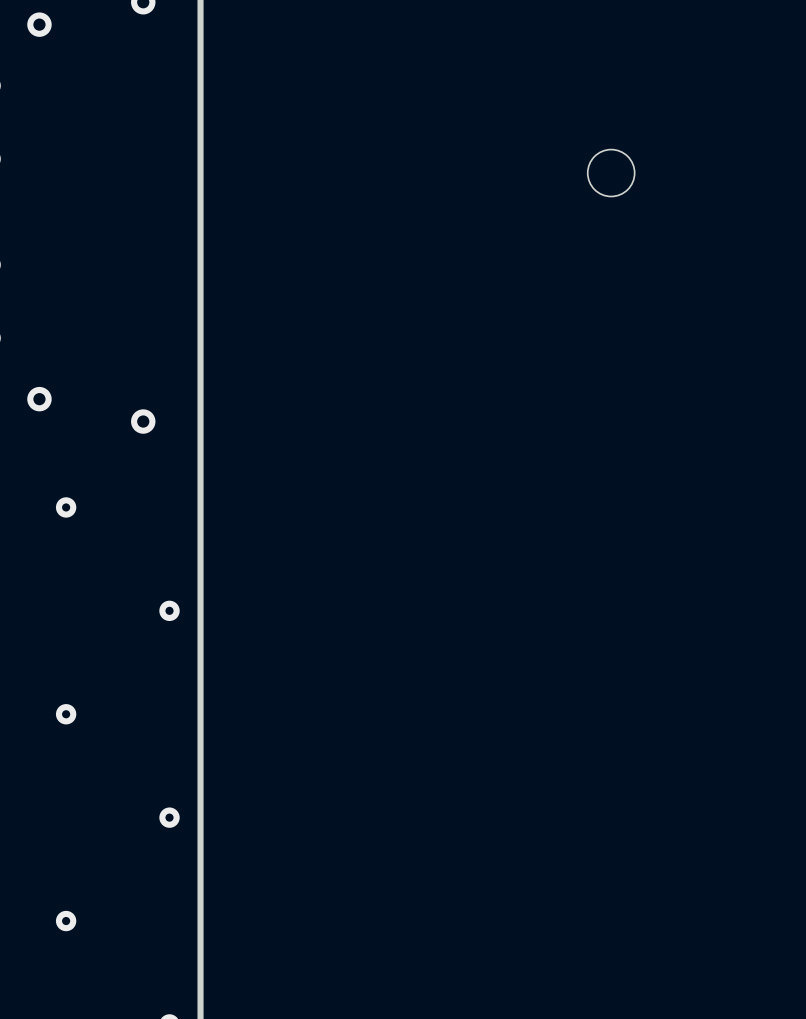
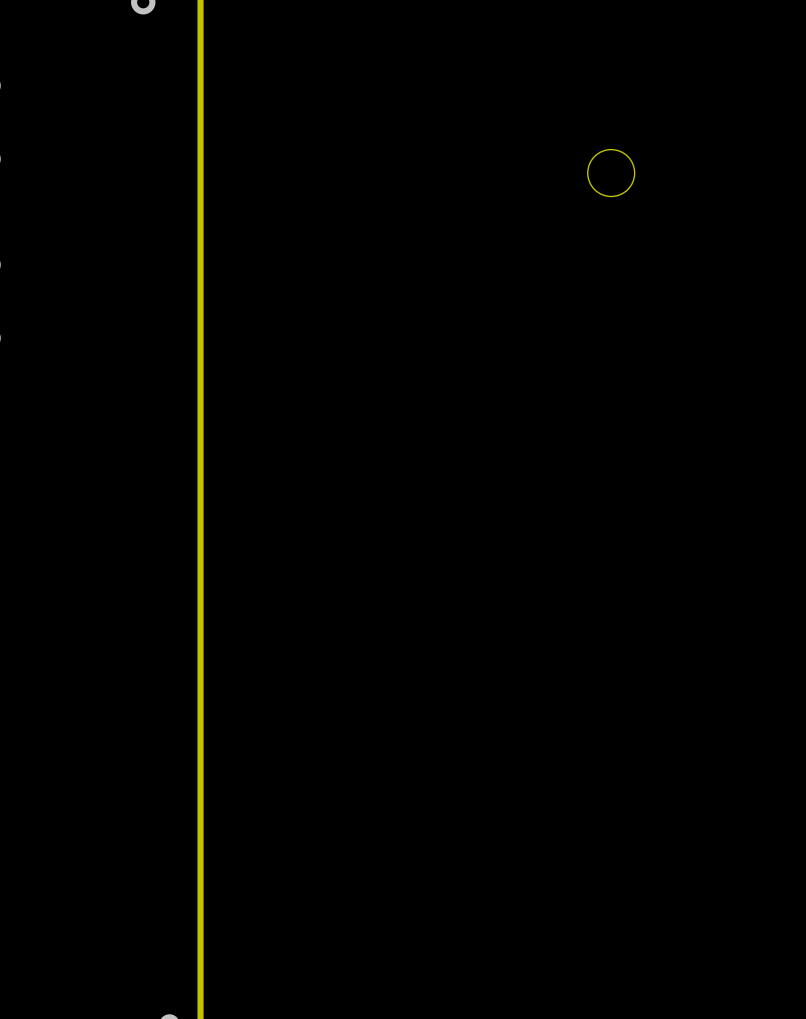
via: (39, 24) -> none
via: (39, 399) -> none
via: (143, 421) -> none
via: (66, 507) -> none
via: (169, 610) -> none
via: (66, 714) -> none
via: (169, 817) -> none
via: (66, 921) -> none

